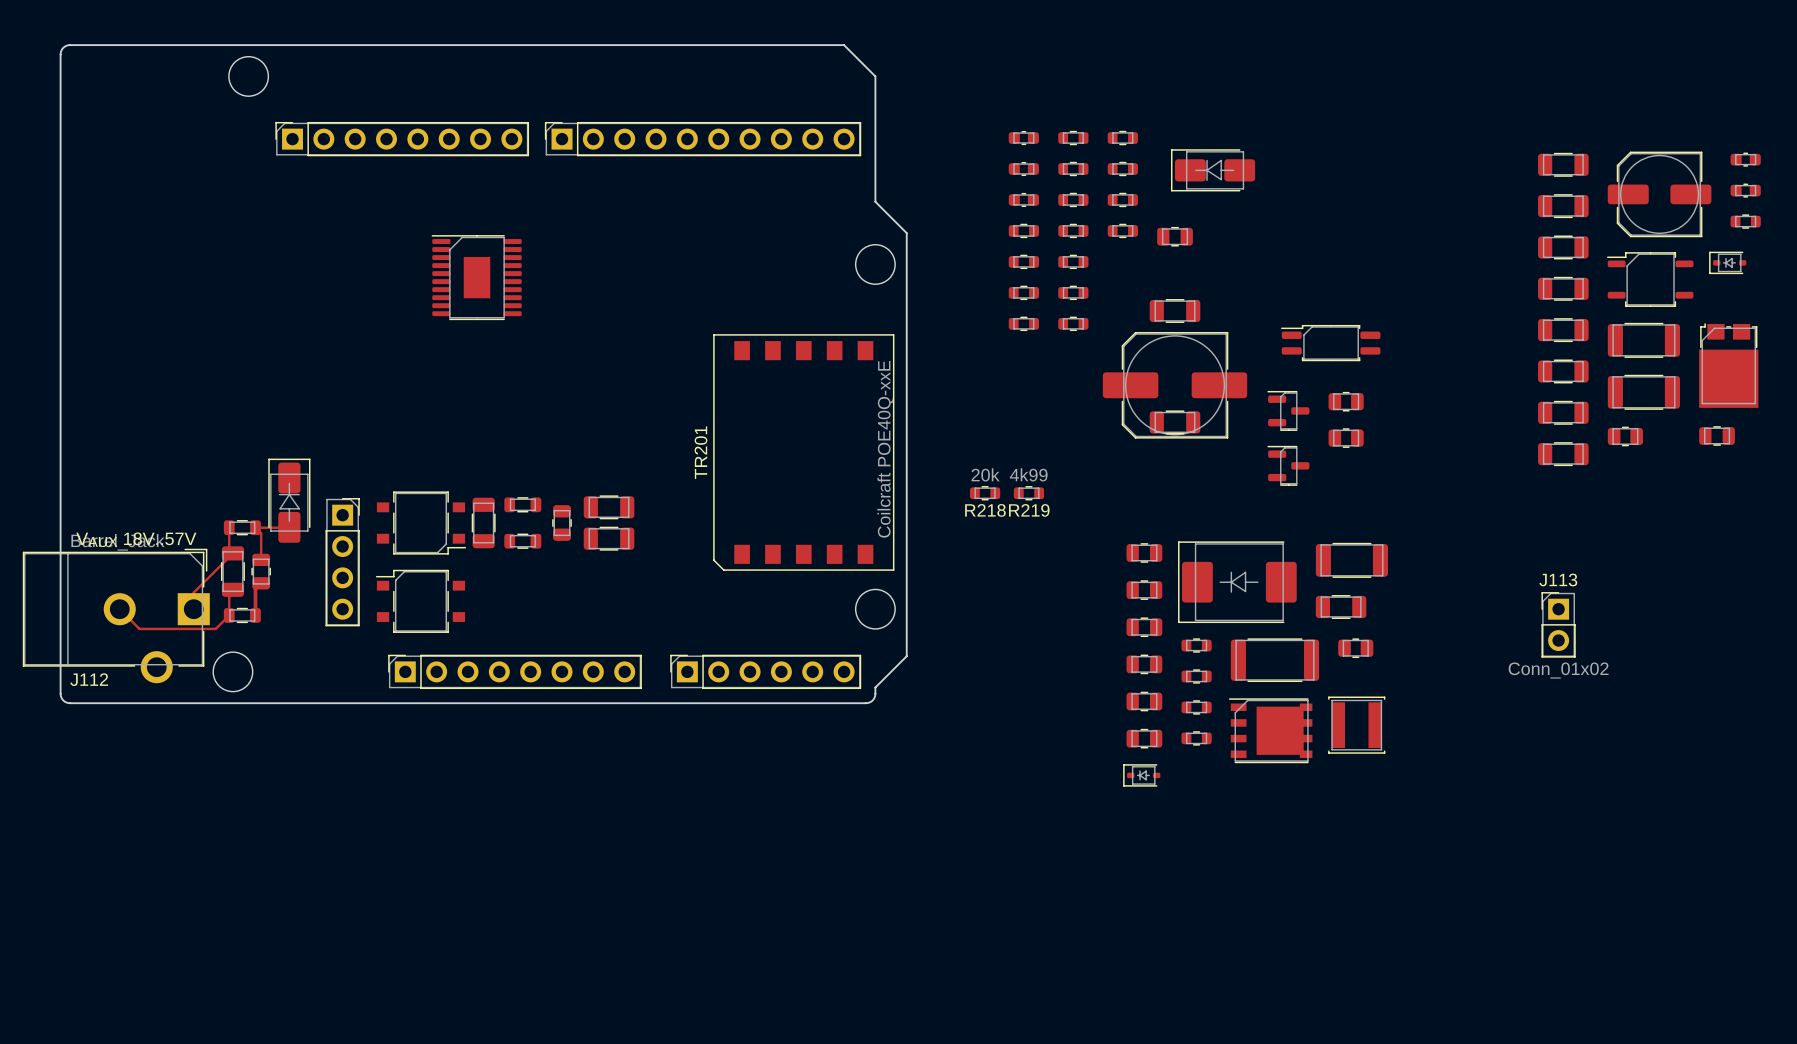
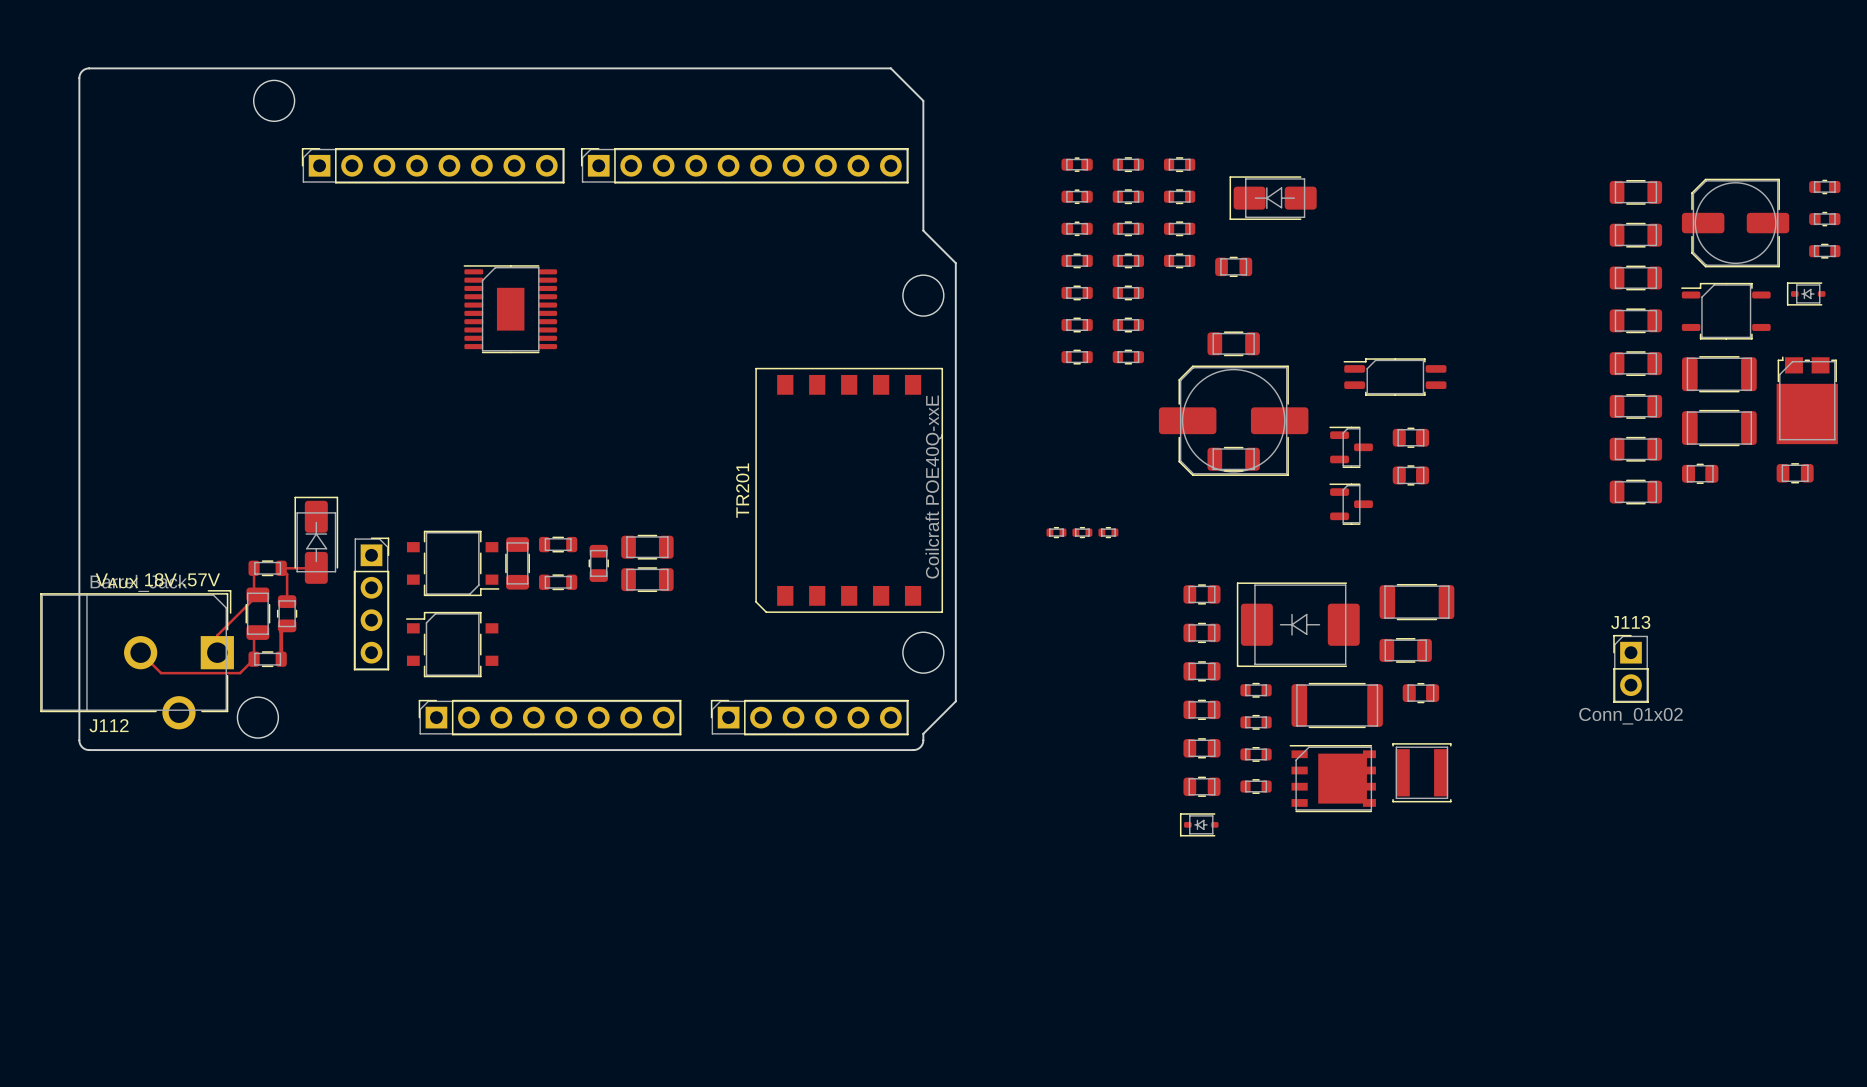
R218: 20k (985, 493) -> none
part: none -> (1056, 532)
R219: 4k99 (1028, 493) -> none
part: none -> (1082, 532)
part: none -> (1108, 532)

